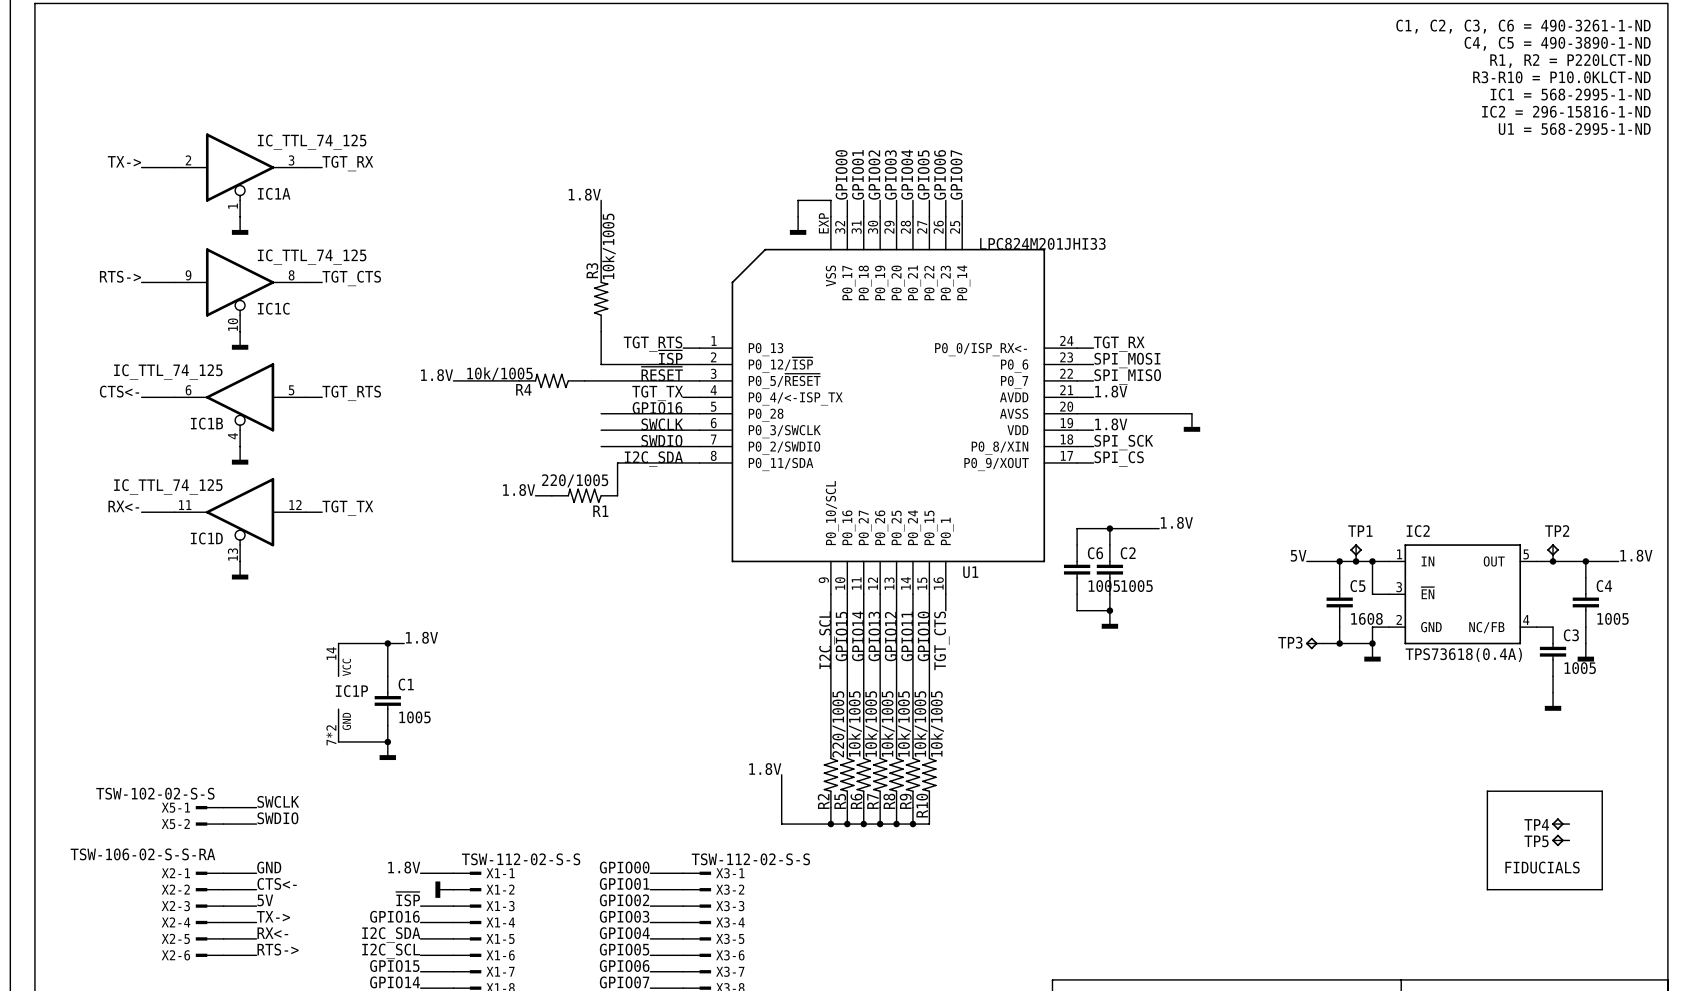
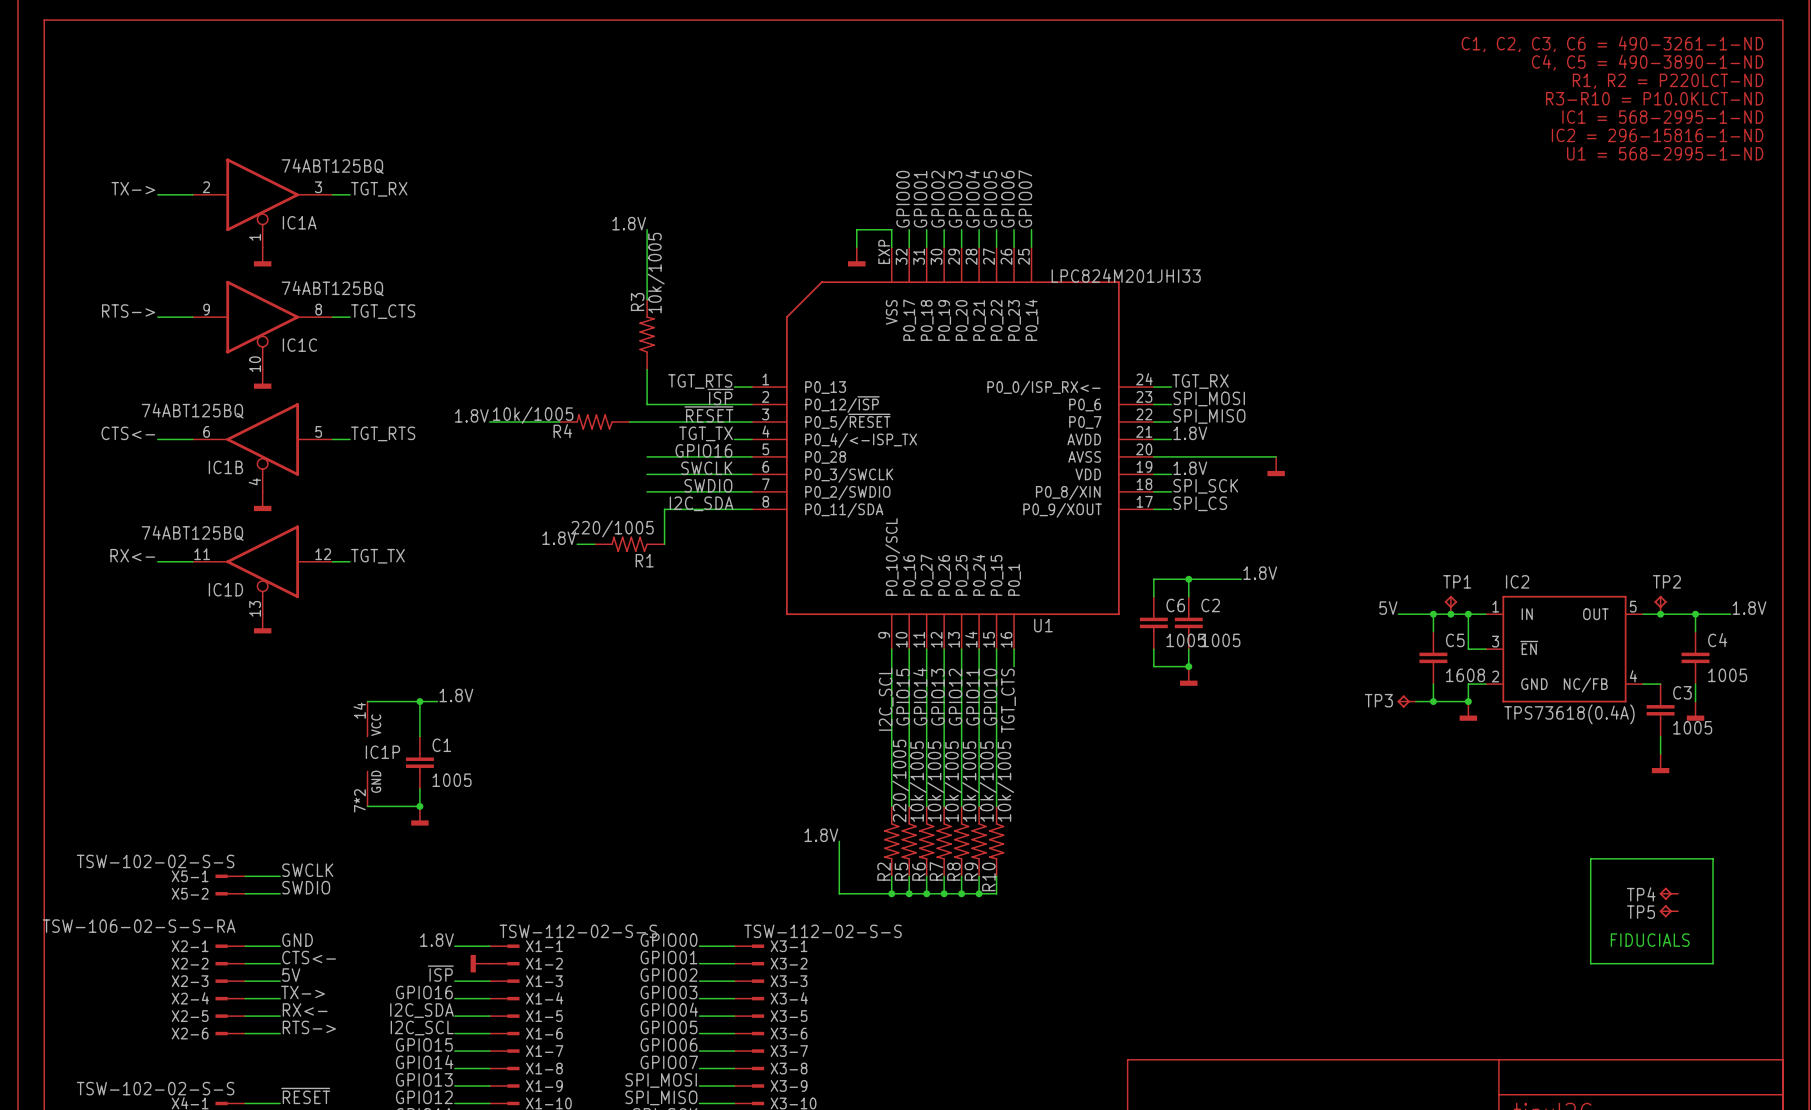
IC1A value: IC_TTL_74_125 (312, 142) -> 74ABT125BQ (332, 166)
IC1C value: IC_TTL_74_125 (312, 257) -> 74ABT125BQ (332, 288)
IC1B value: IC_TTL_74_125 (168, 372) -> 74ABT125BQ (192, 410)
IC1D value: IC_TTL_74_125 (168, 486) -> 74ABT125BQ (192, 533)

